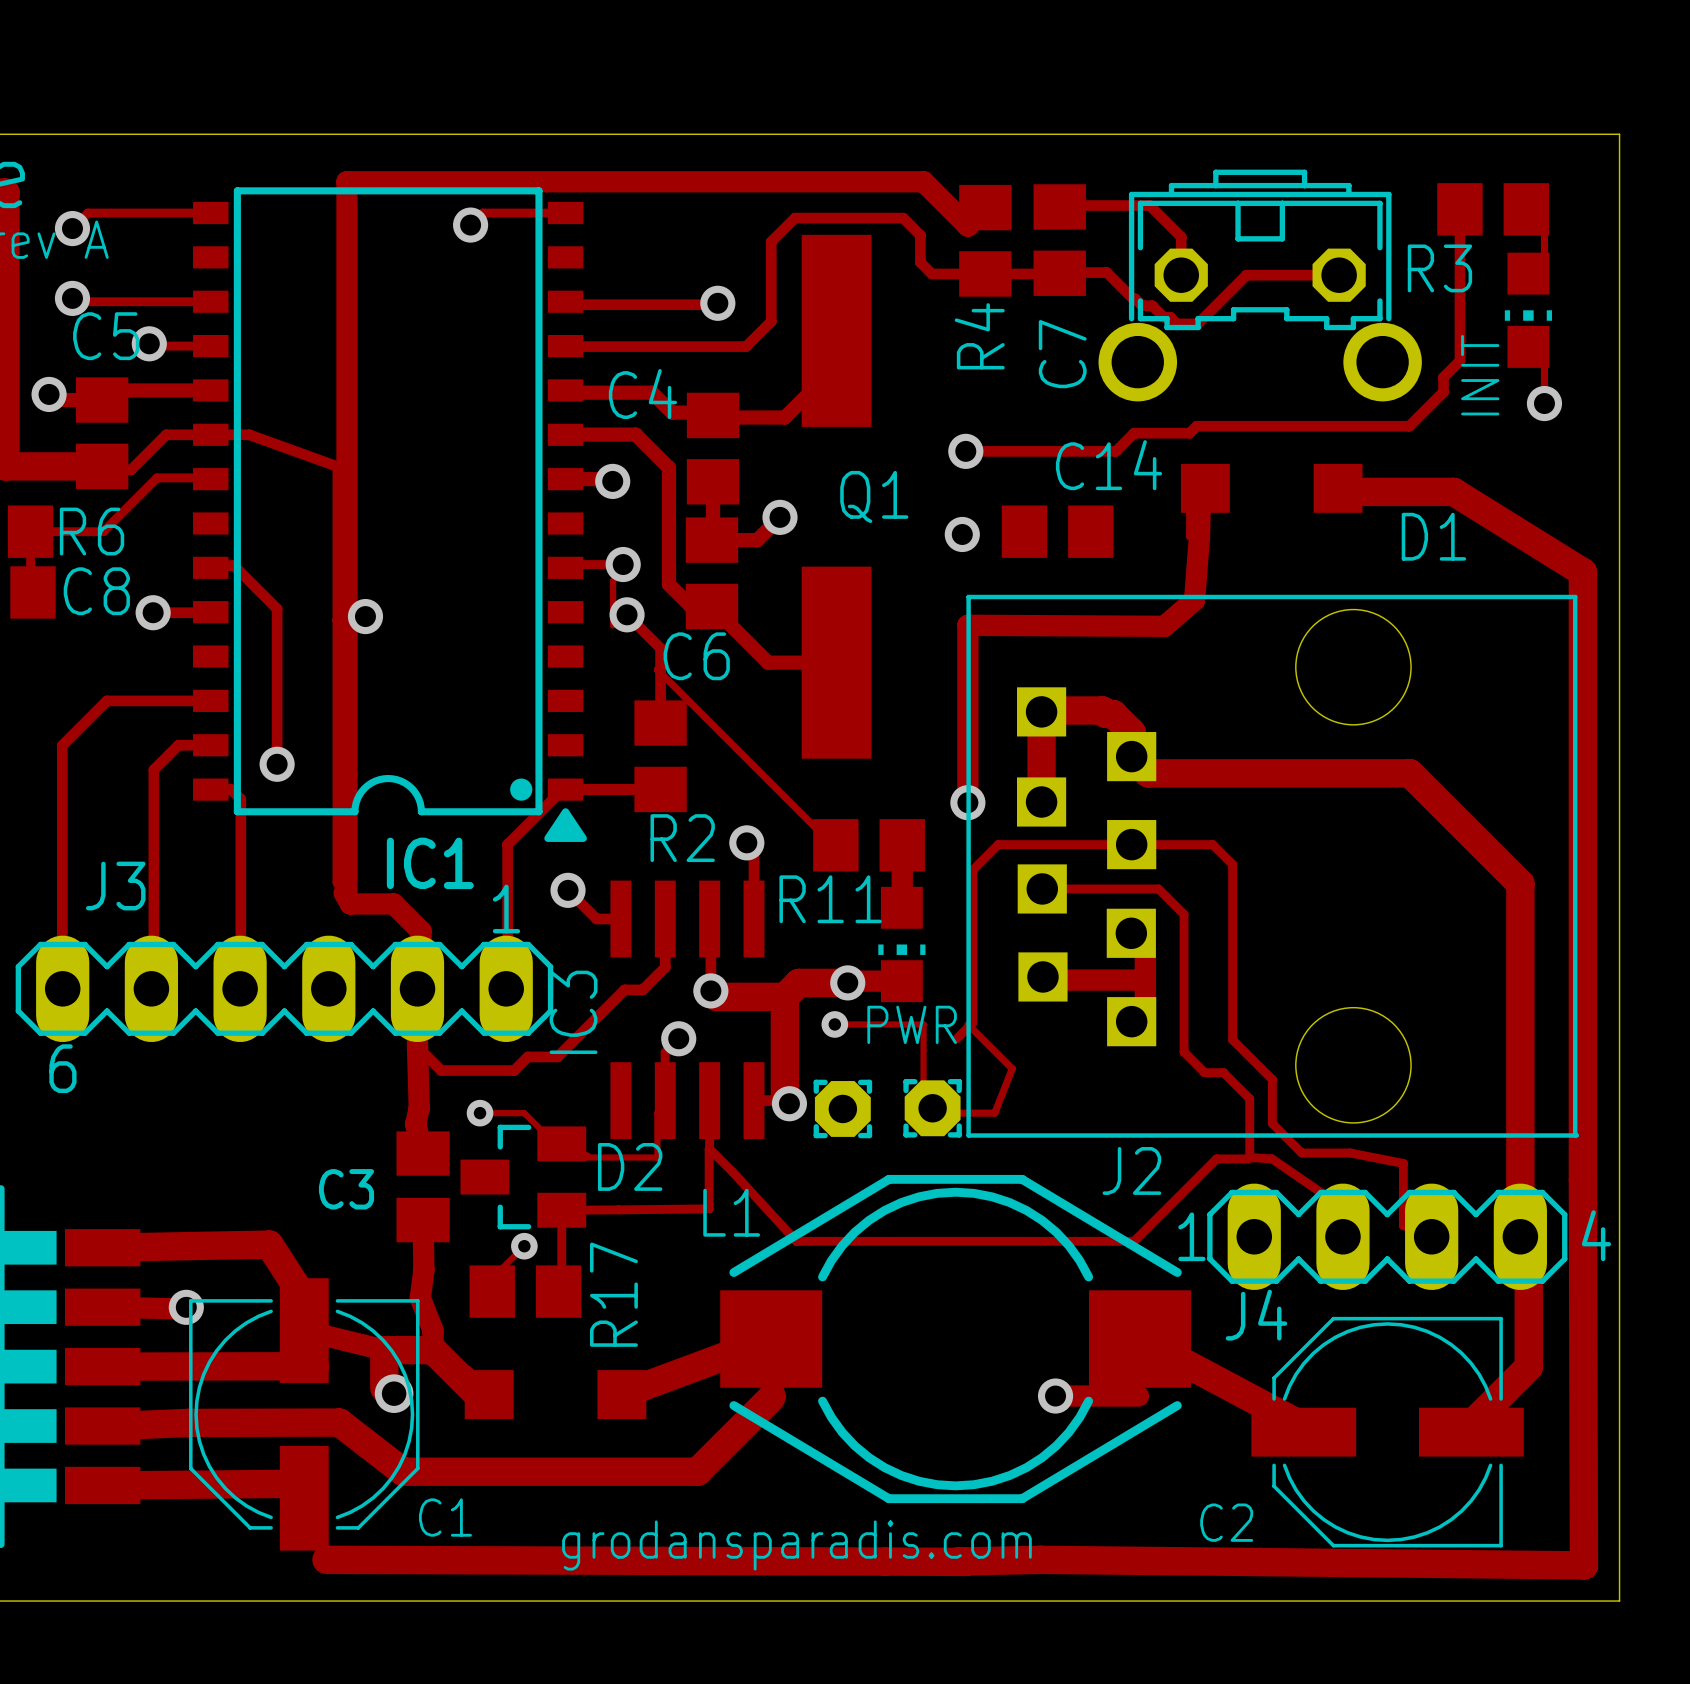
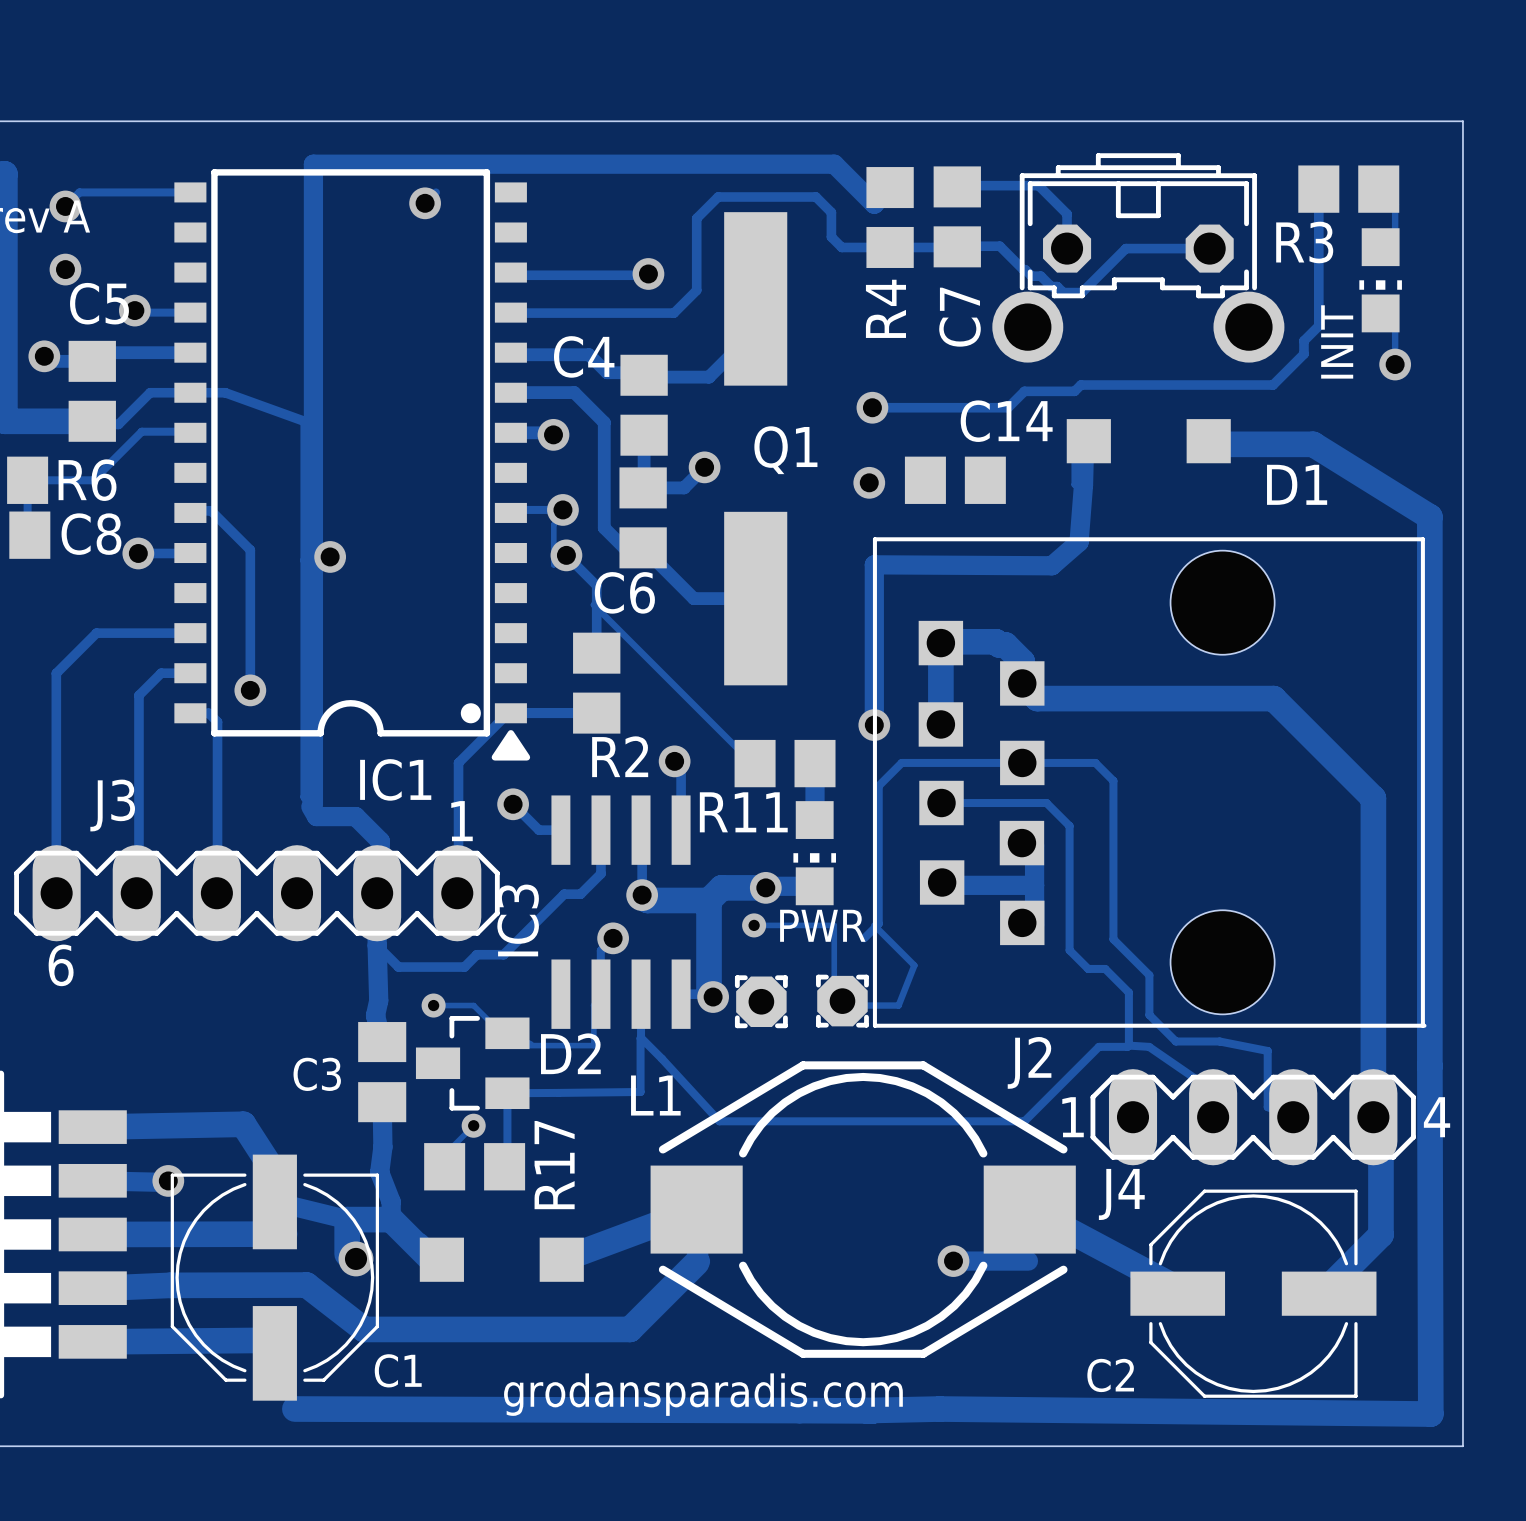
track: (482, 213) (565, 213) -> none
track: (75, 301) (210, 301) -> none

